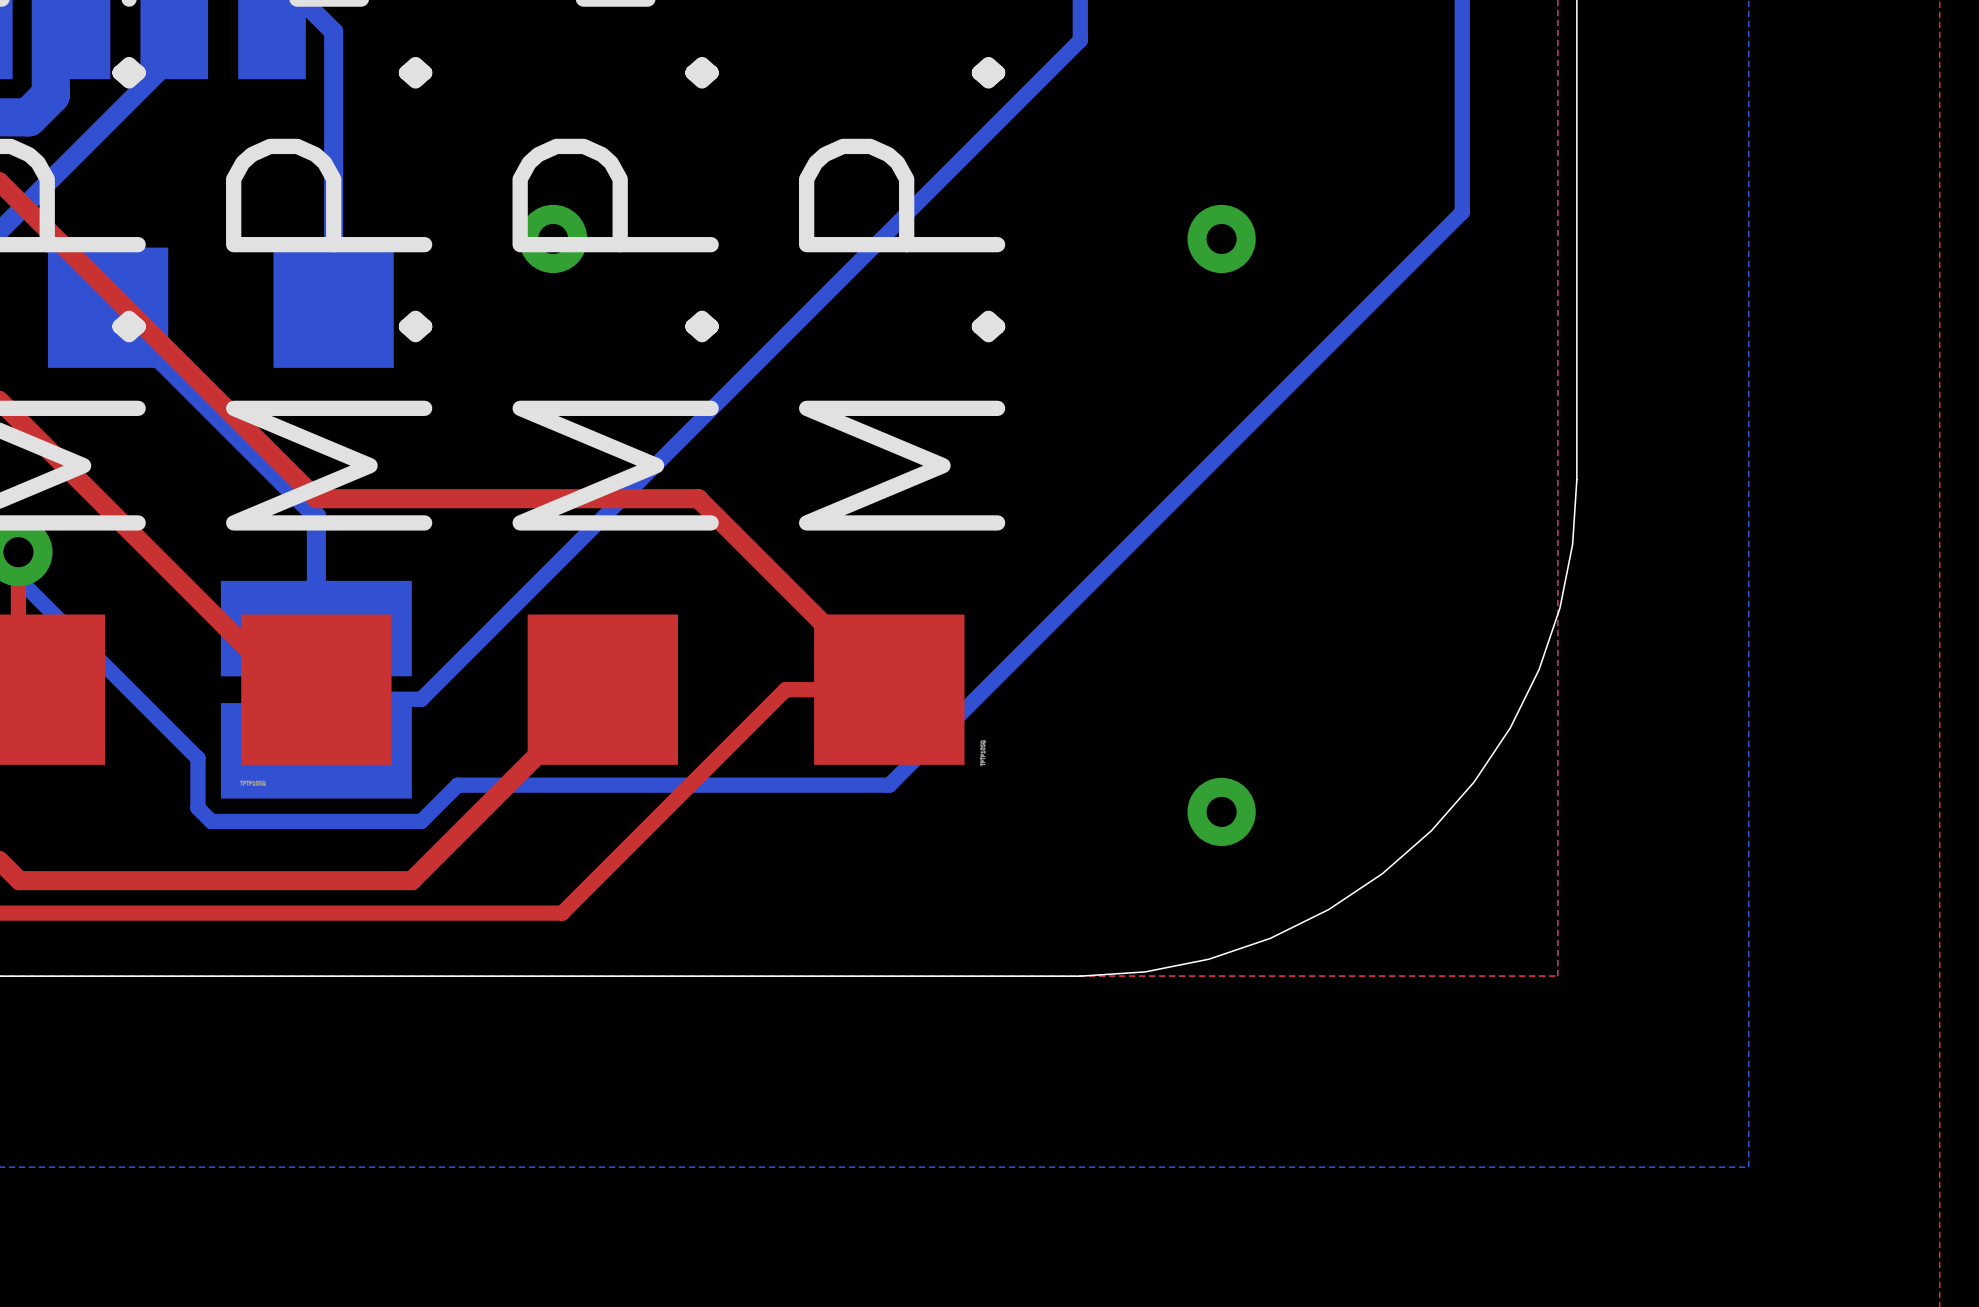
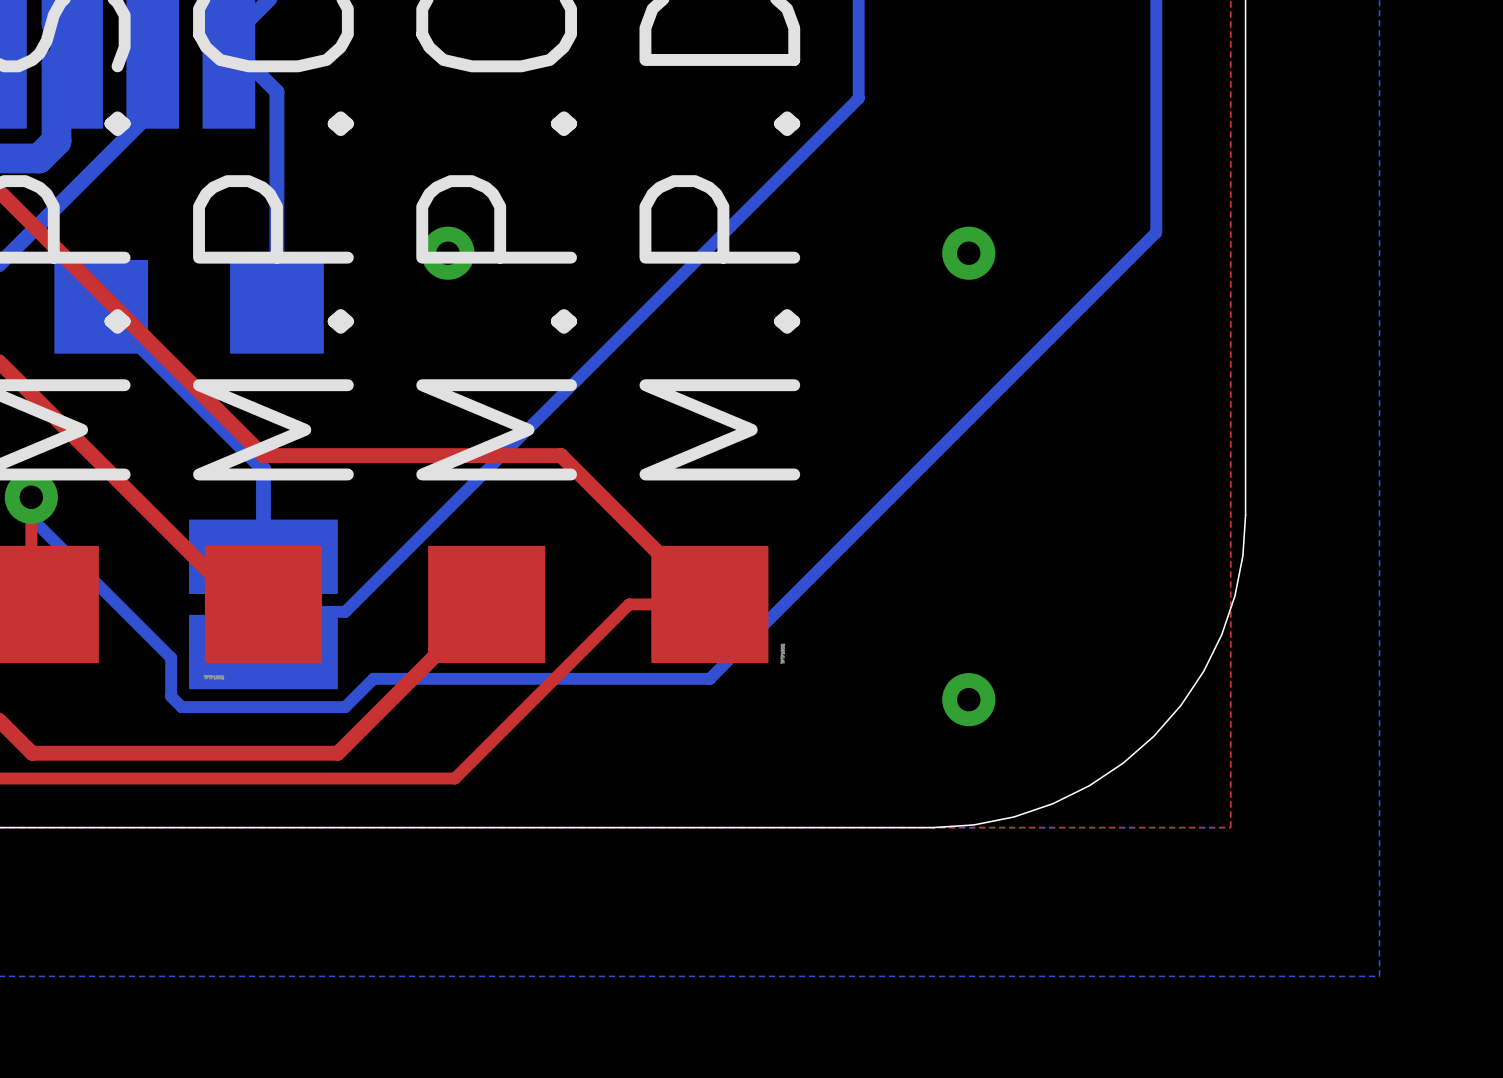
board edge: (1576, 479) (1572, 544) (1559, 608) (1539, 669) (1510, 727) (1474, 781) (1431, 830) (1382, 873) (1328, 909) (1270, 938) (1208, 959) (1145, 971) (1080, 976) -> (1245, 440) (1245, 515) (1242, 555) (1234, 596) (1221, 634) (1203, 671) (1180, 705) (1154, 736) (1123, 763) (1089, 785) (1052, 803) (1013, 816) (973, 824) (933, 827) (858, 827)

